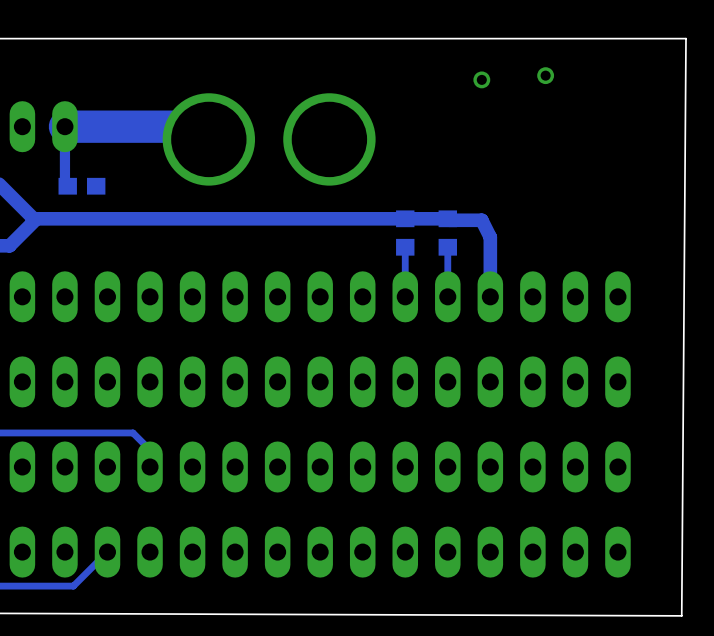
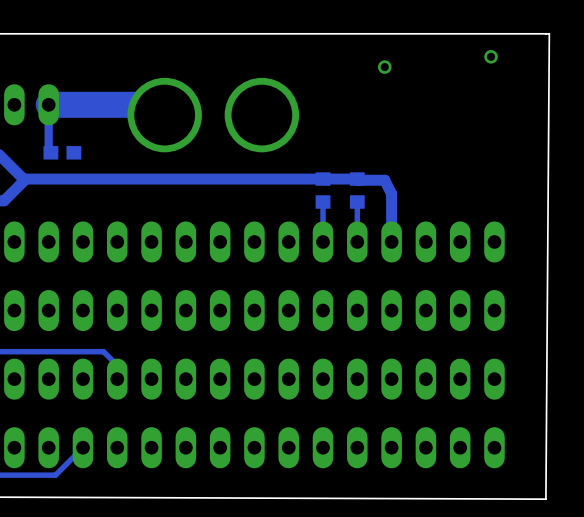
via position: (545, 75) -> (491, 56)

